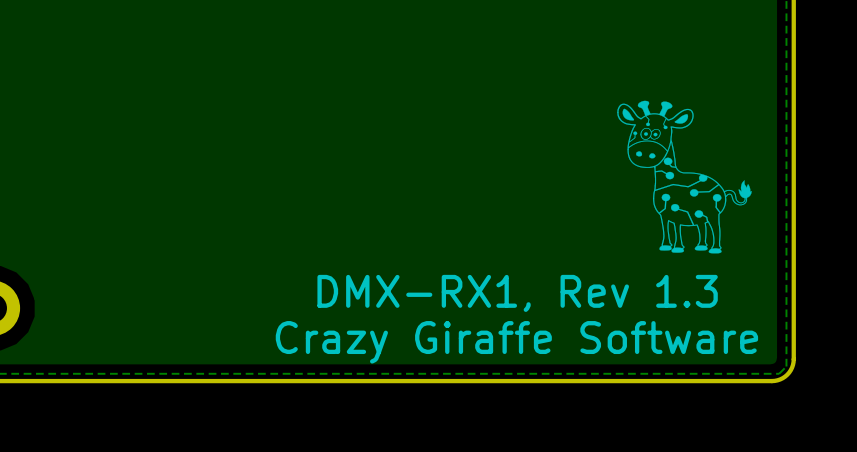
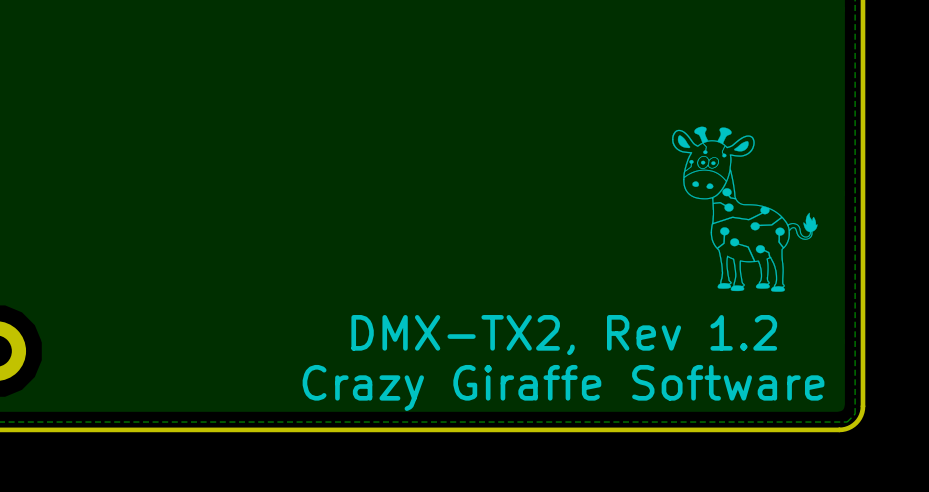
text: DMX-RX1, Rev 1.3 (517, 293) -> DMX-TX2, Rev 1.2 (564, 335)

